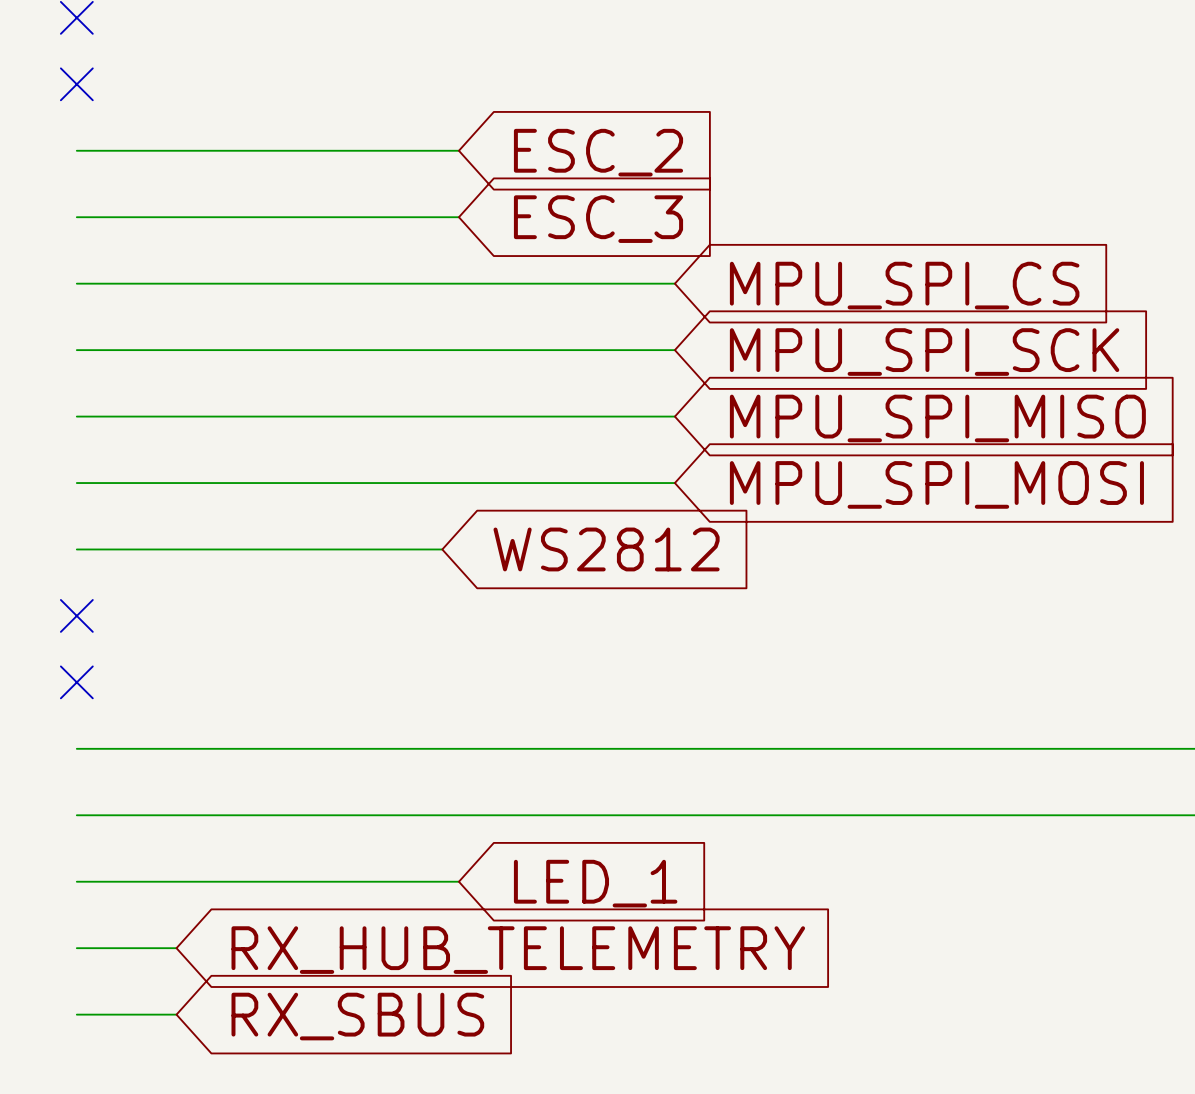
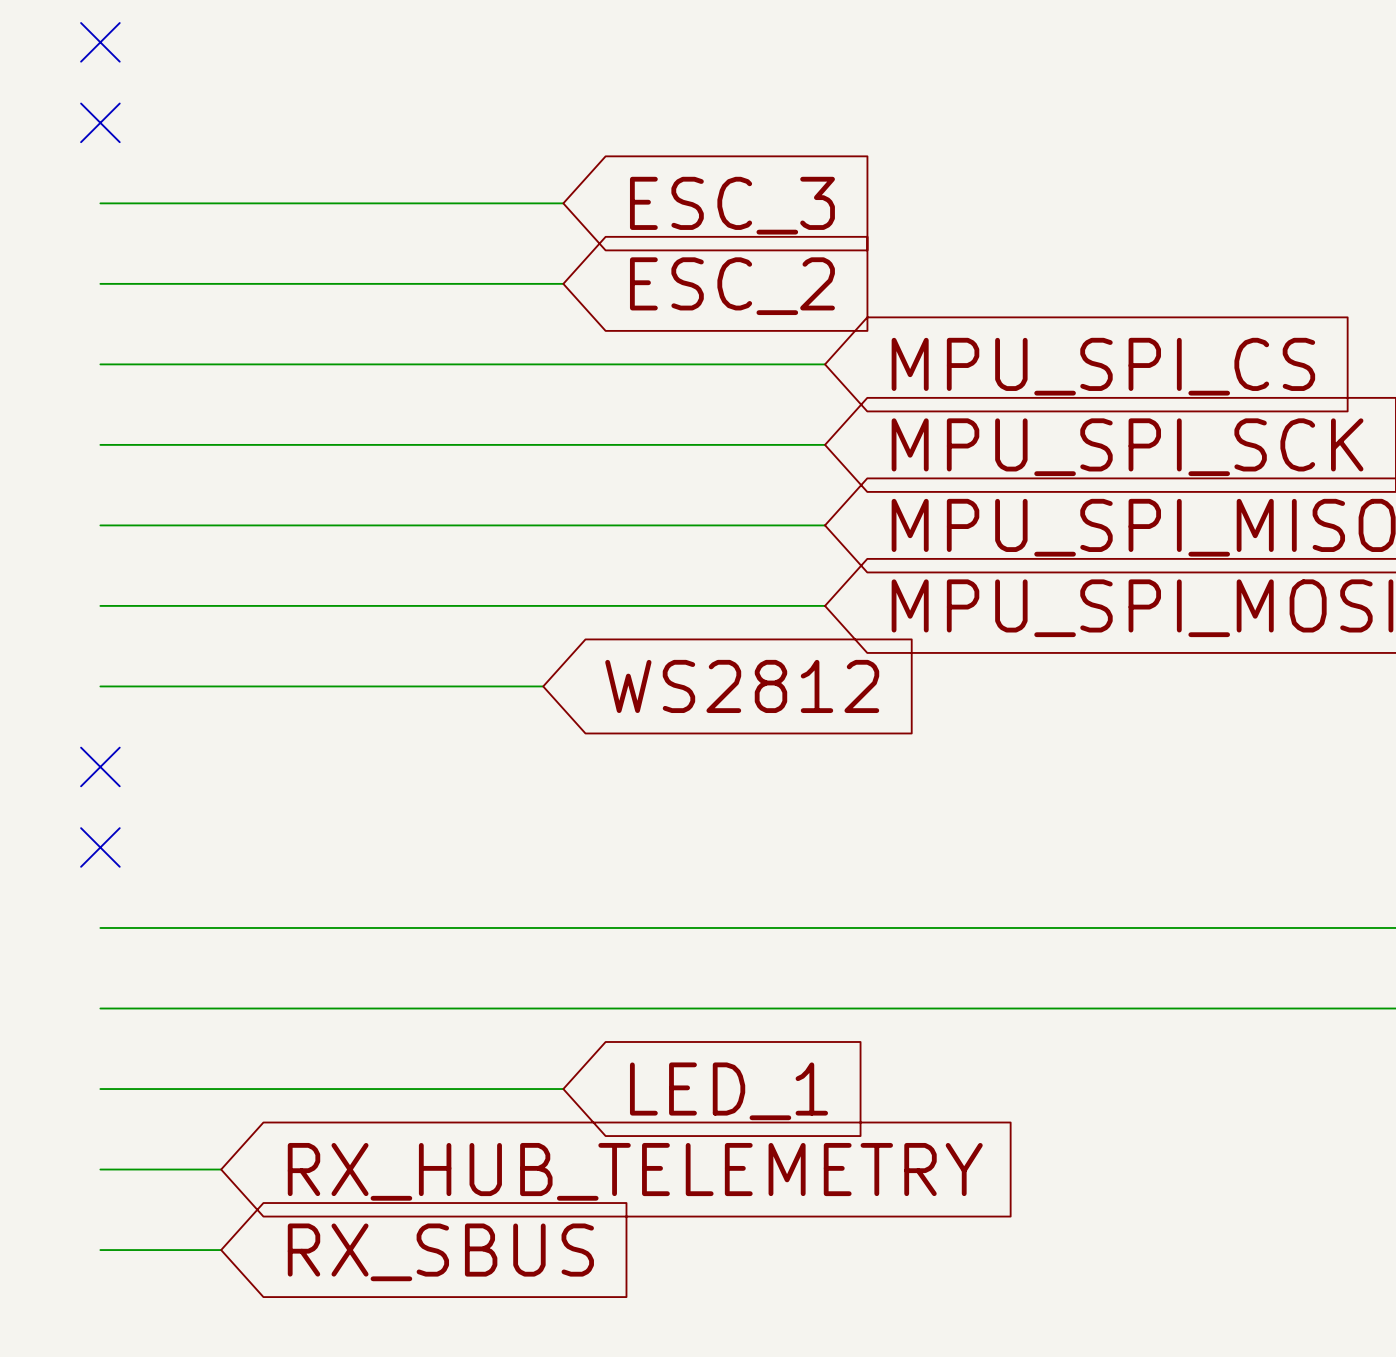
global label: ESC_2 (598, 152) -> ESC_3 (732, 205)
global label: ESC_3 (598, 219) -> ESC_2 (732, 286)

